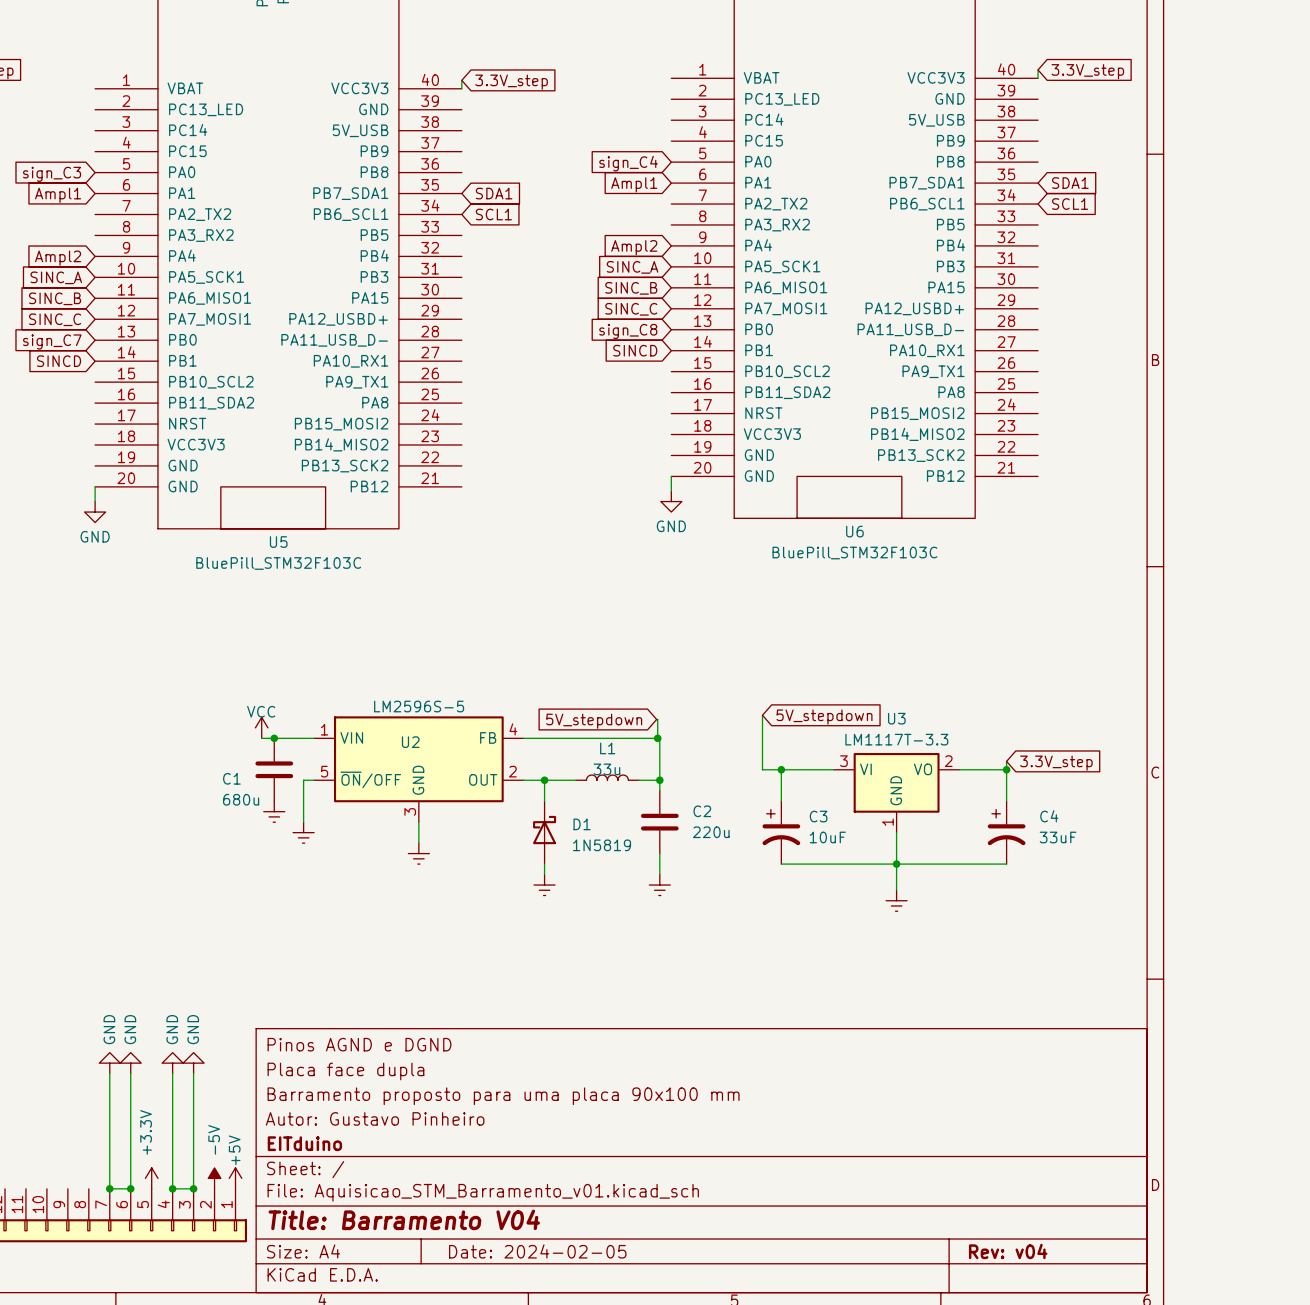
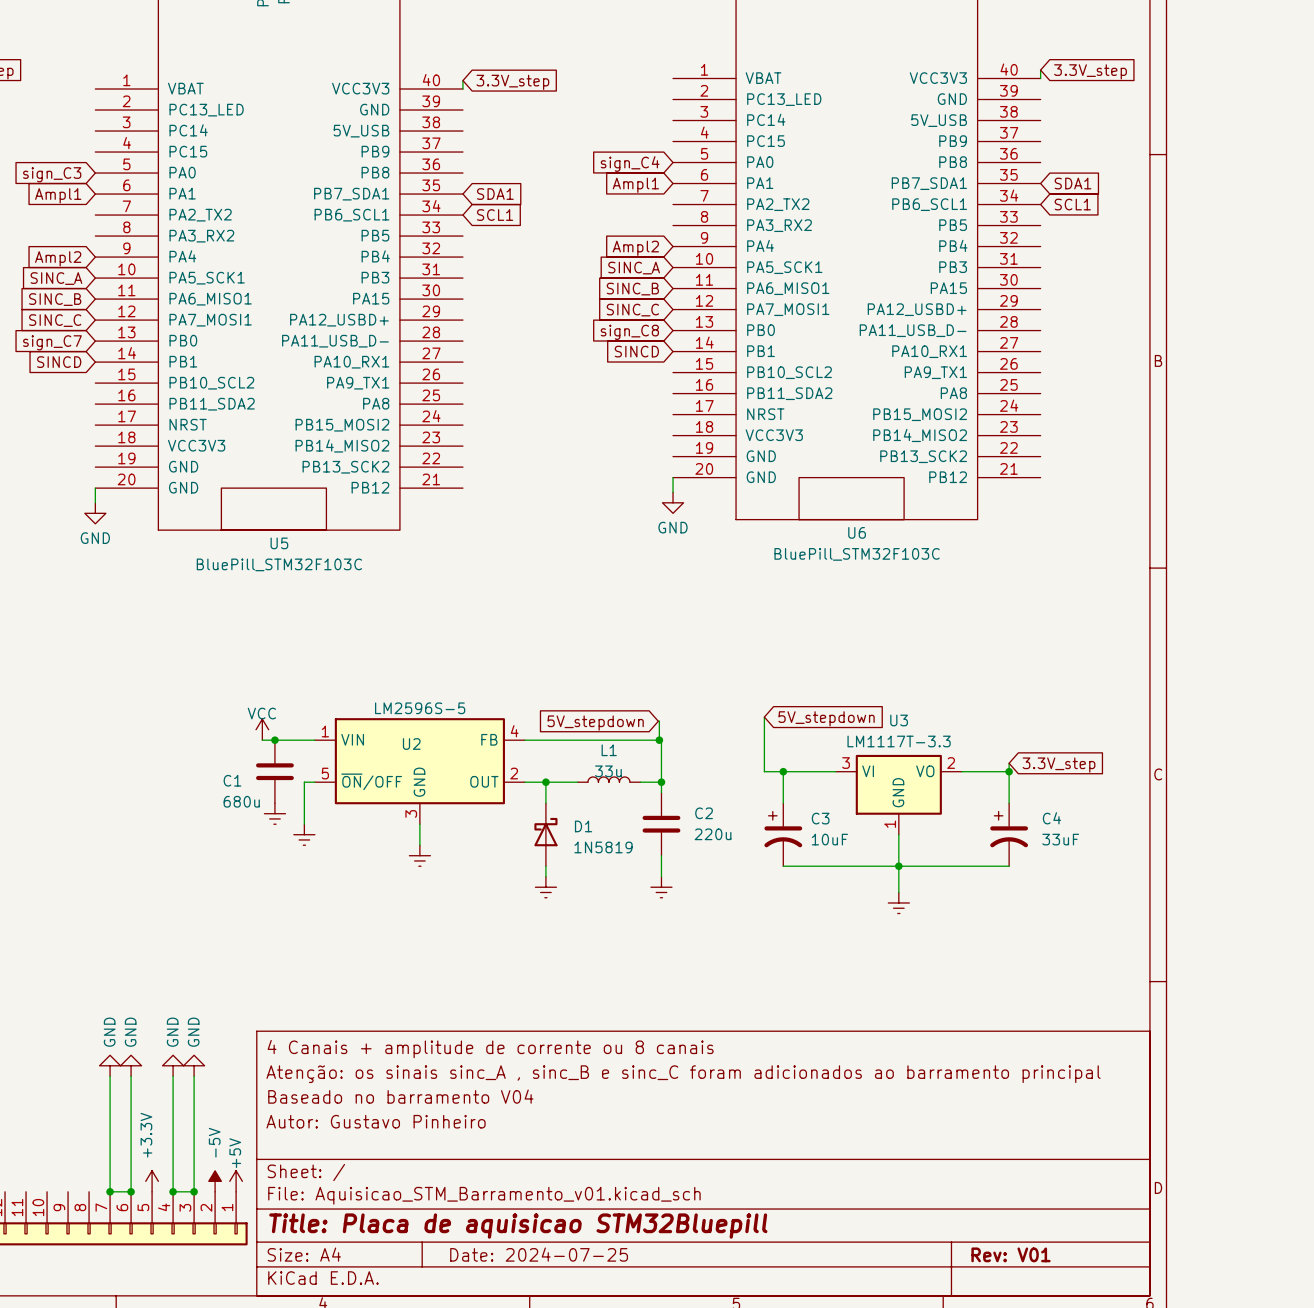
title block: Pinos AGND e DGND (359, 1044) -> 4 Canais + amplitude de corrente ou 8 canais (490, 1049)
title block: Placa face dupla (345, 1071) -> Atenção: os sinais sinc_A , sinc_B e sinc_C foram adicionados ao barramento principal (683, 1074)
title block: Barramento proposto para uma placa 90x100 mm (503, 1096) -> Baseado no barramento V04 (400, 1096)
title block: EITduino (304, 1143) -> none
title block: Title: Barramento V04 (404, 1219) -> Title: Placa de aquisicao STM32Bluepill (518, 1226)
title block: Date: 2024-02-05 (537, 1251) -> Date: 2024-07-25 (539, 1254)
title block: Rev: v04 (1008, 1251) -> Rev: V01 (1010, 1254)

